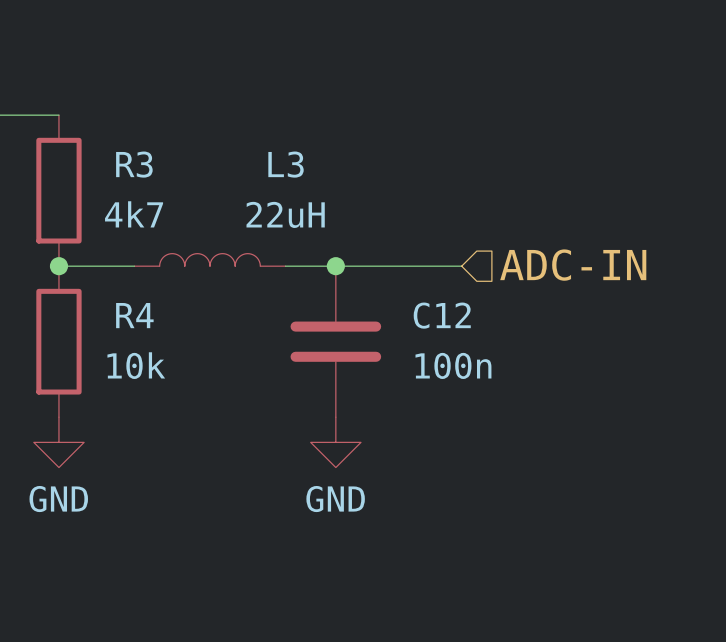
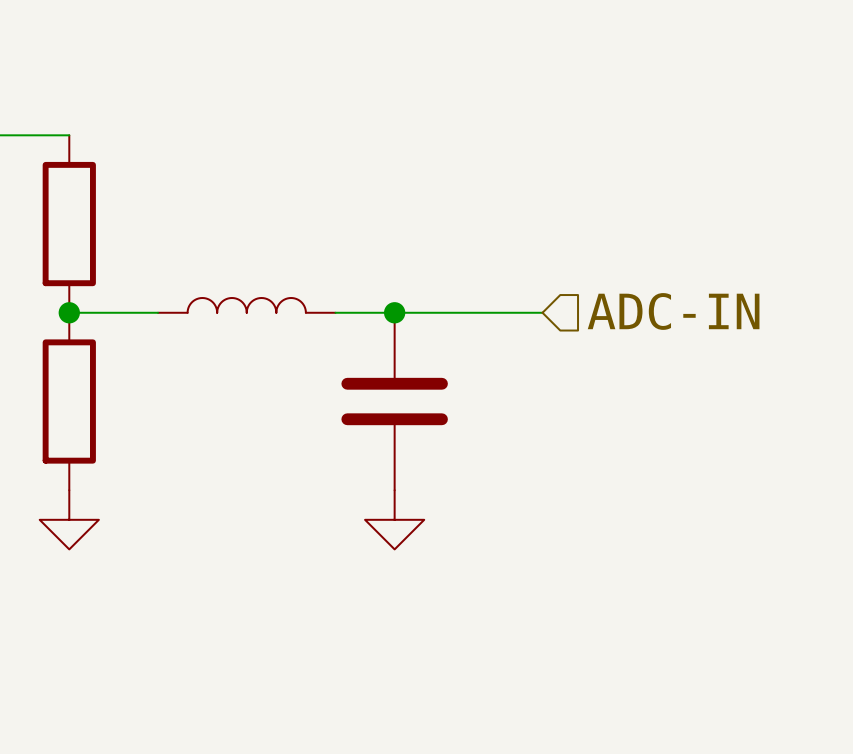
R3 name: R3 (134, 164) -> none
R3 value: 4k7 (134, 214) -> none
L3: 22uH (209, 259) -> none
R4 name: R4 (134, 315) -> none
C12 name: C12 (442, 315) -> none
R4 value: 10k (136, 365) -> none
C12 value: 100n (453, 365) -> none
power symbol text: GND (58, 499) -> none
power symbol text: GND (335, 499) -> none

